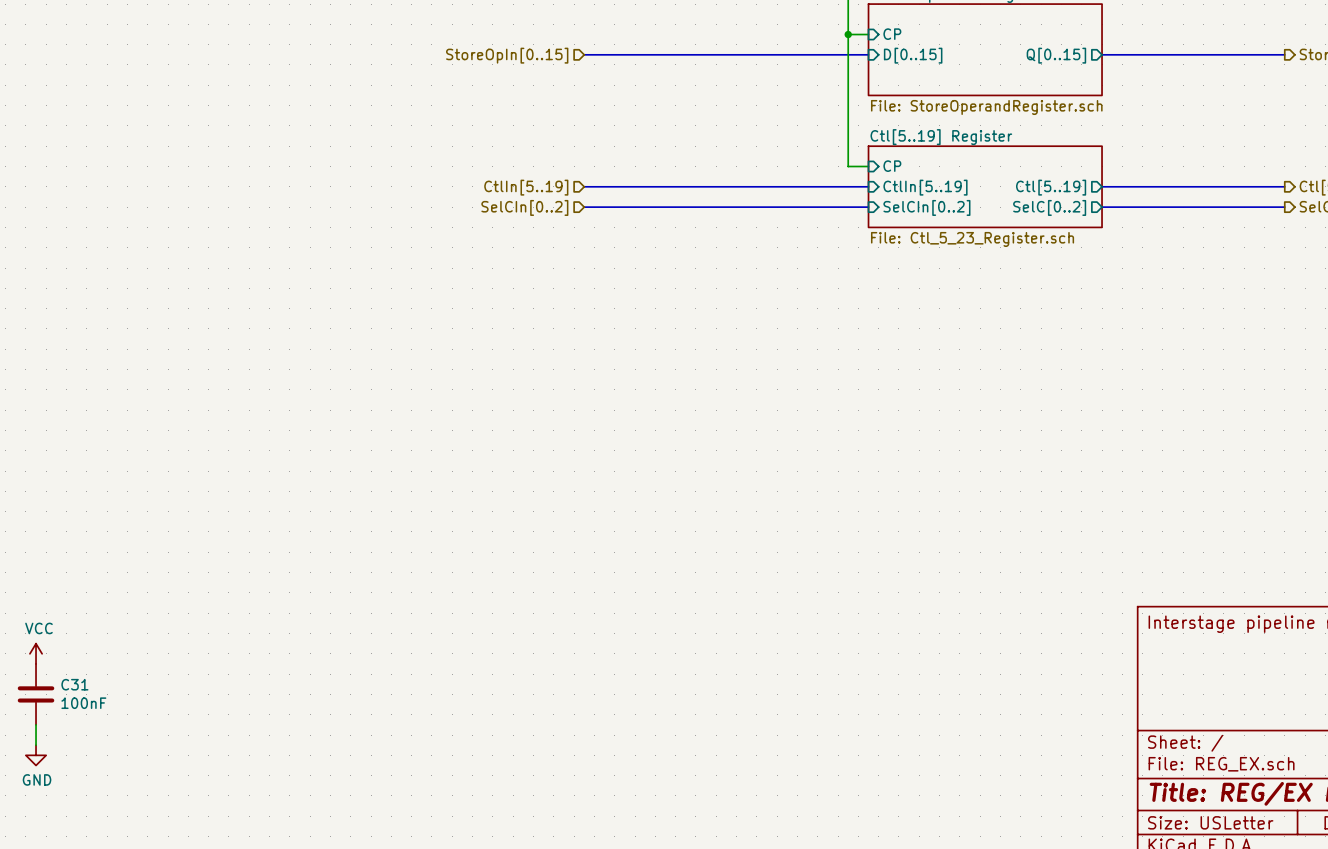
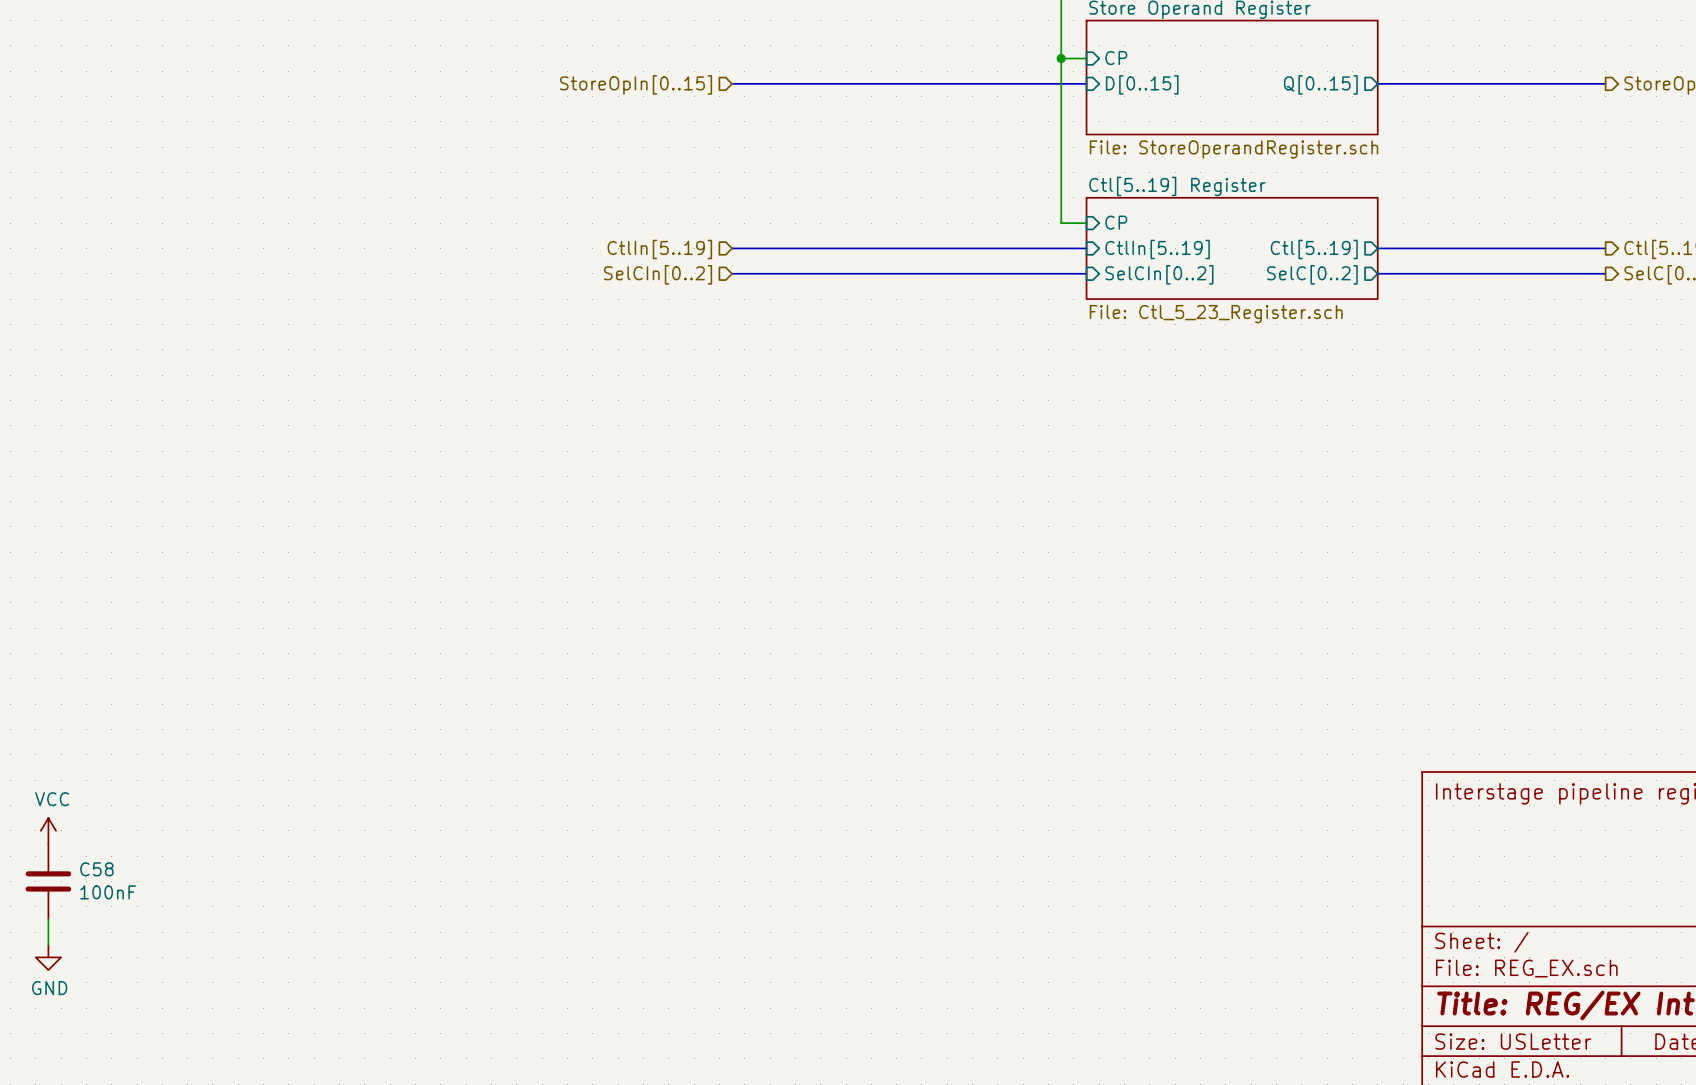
C31 name: C31 (74, 684) -> C58 (96, 869)

